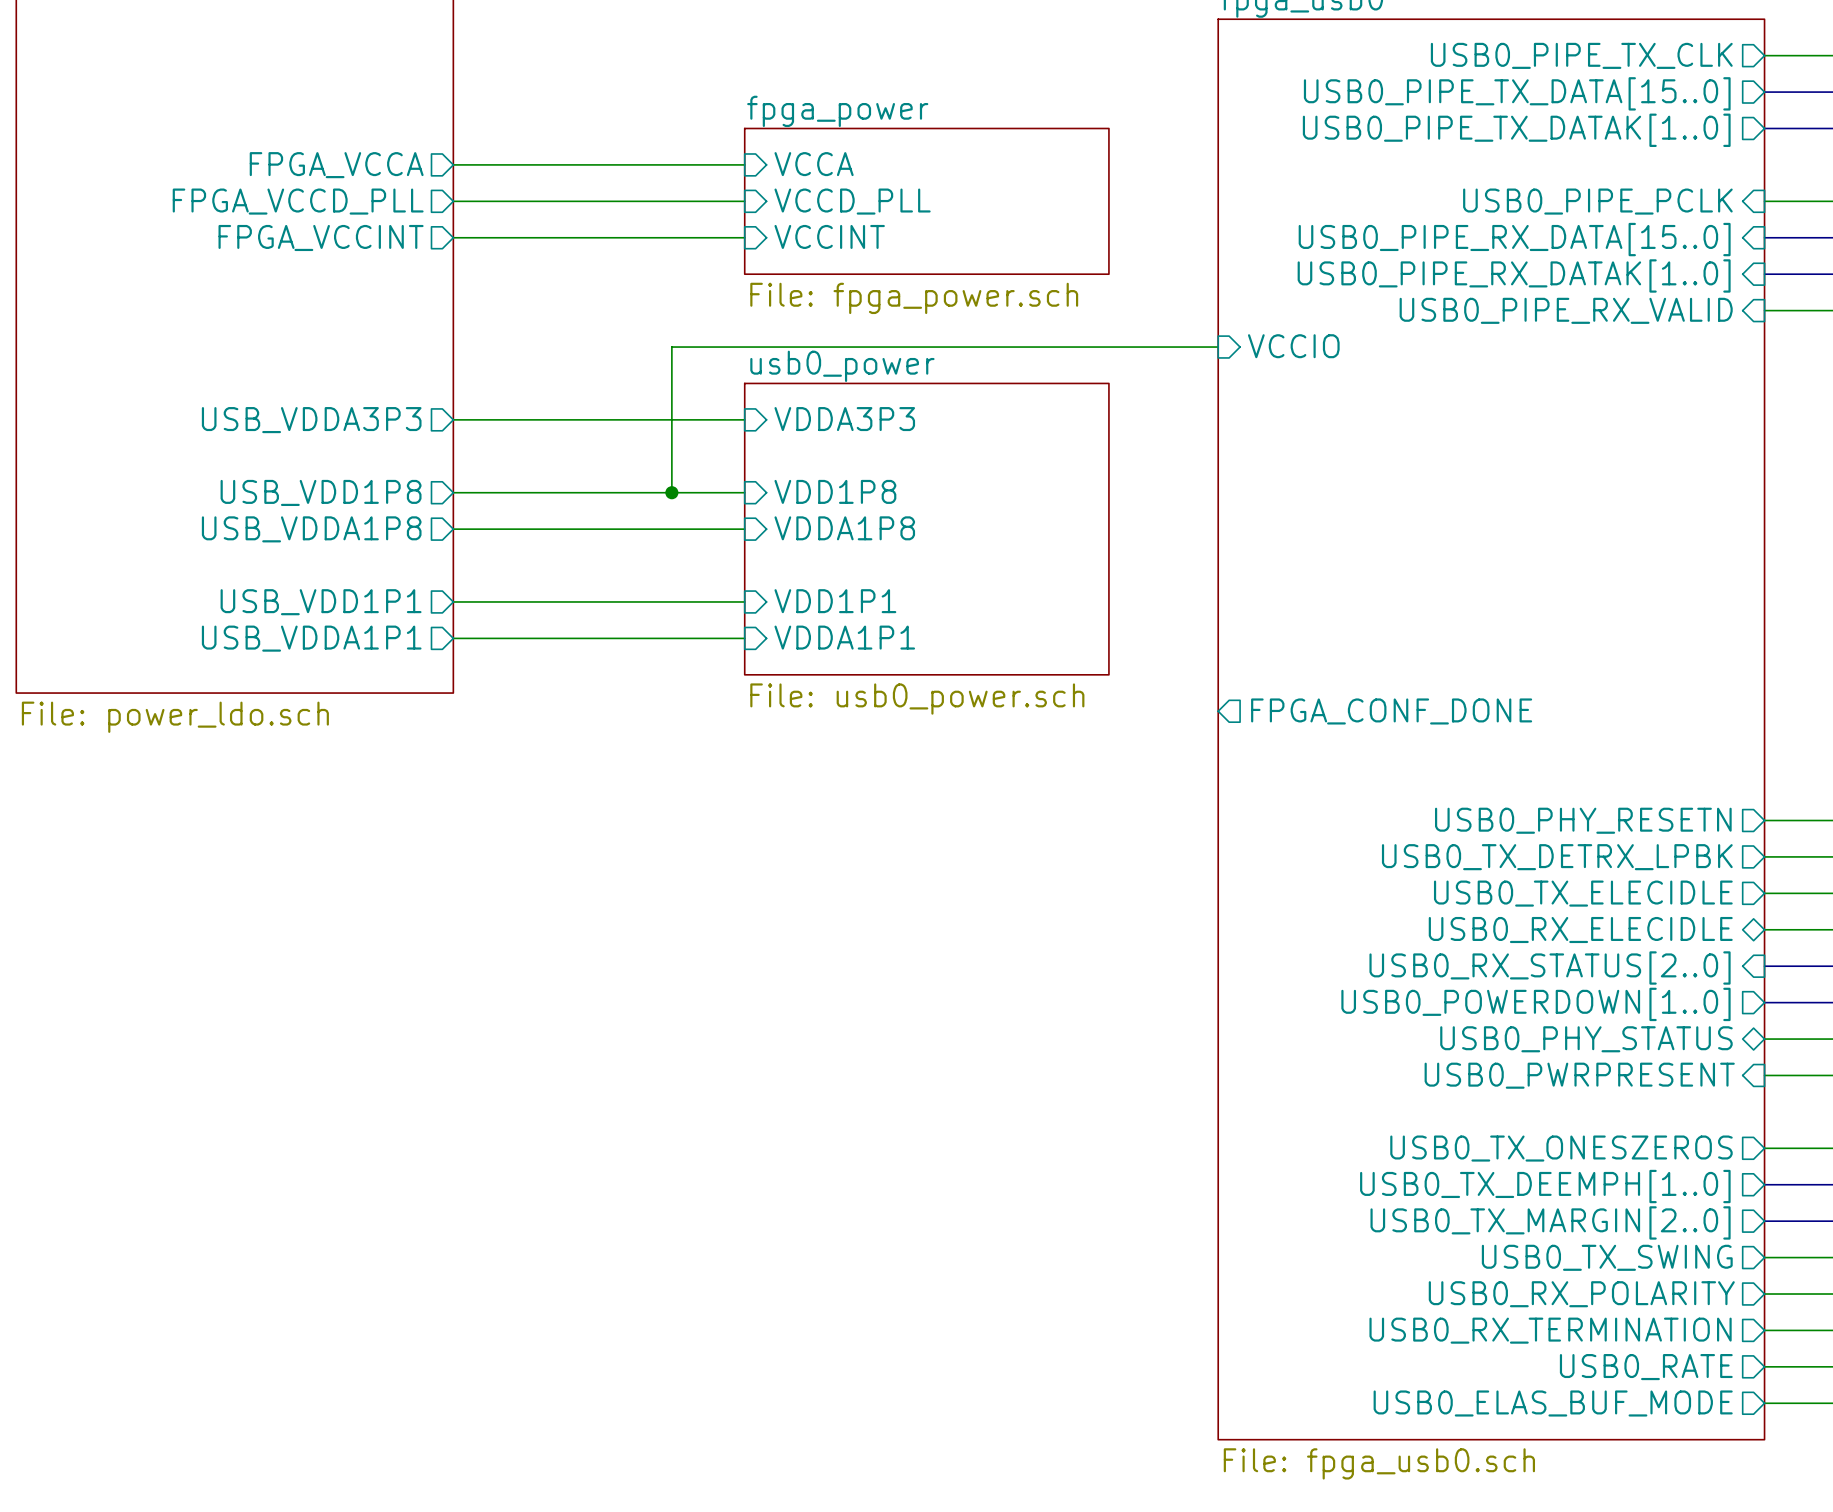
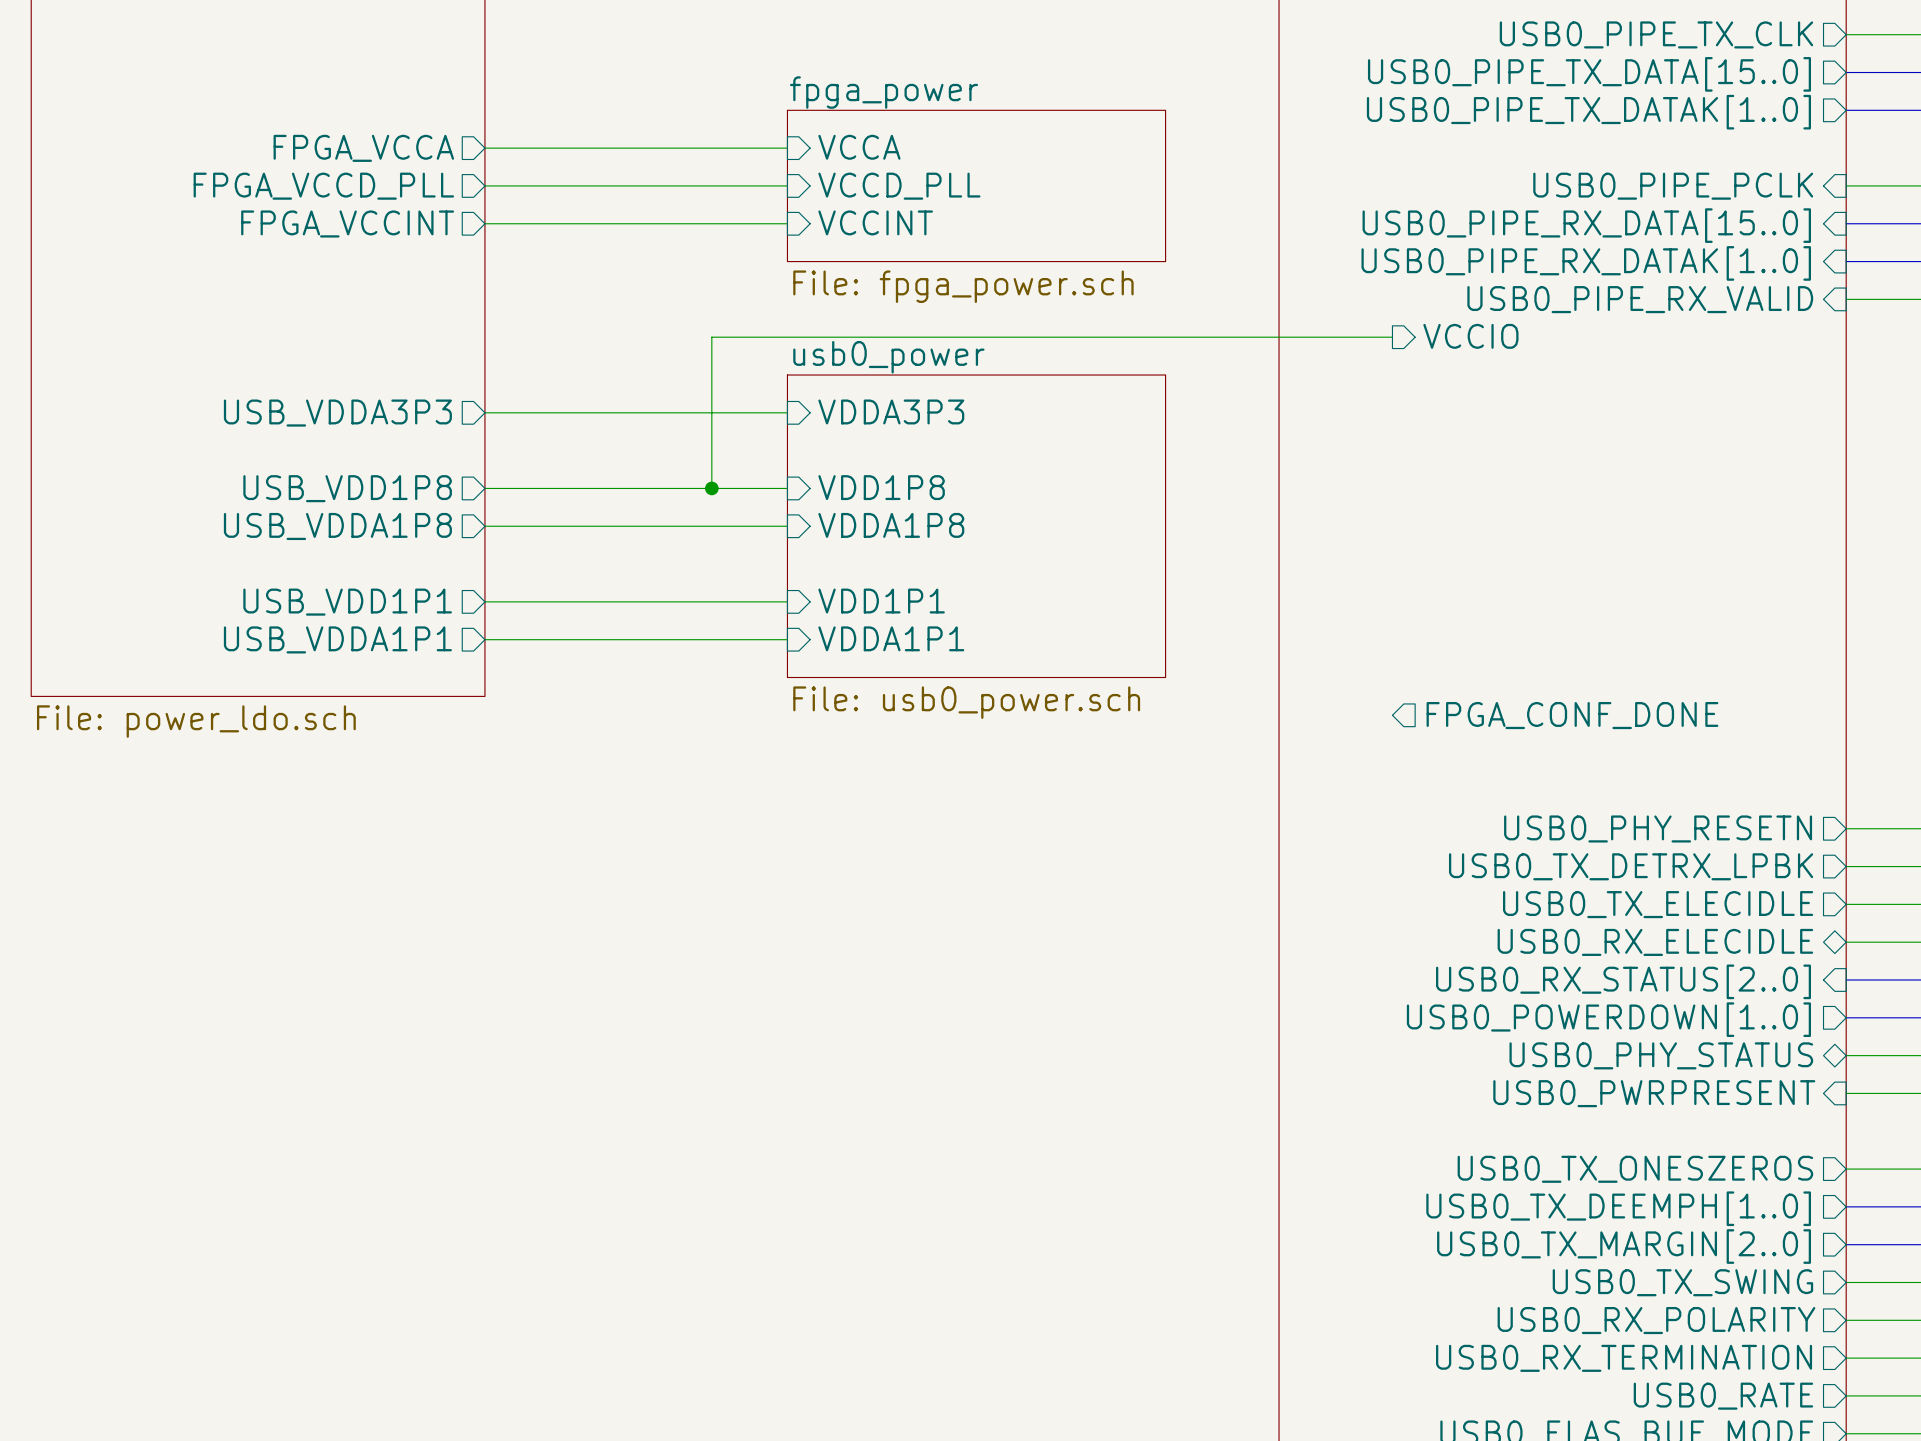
sheet pin position: VCCIO (1293, 346) -> VCCIO (1470, 336)
wire: none -> (1279, 337) (1392, 337)
sheet pin position: FPGA_CONF_DONE (1391, 711) -> FPGA_CONF_DONE (1572, 715)

